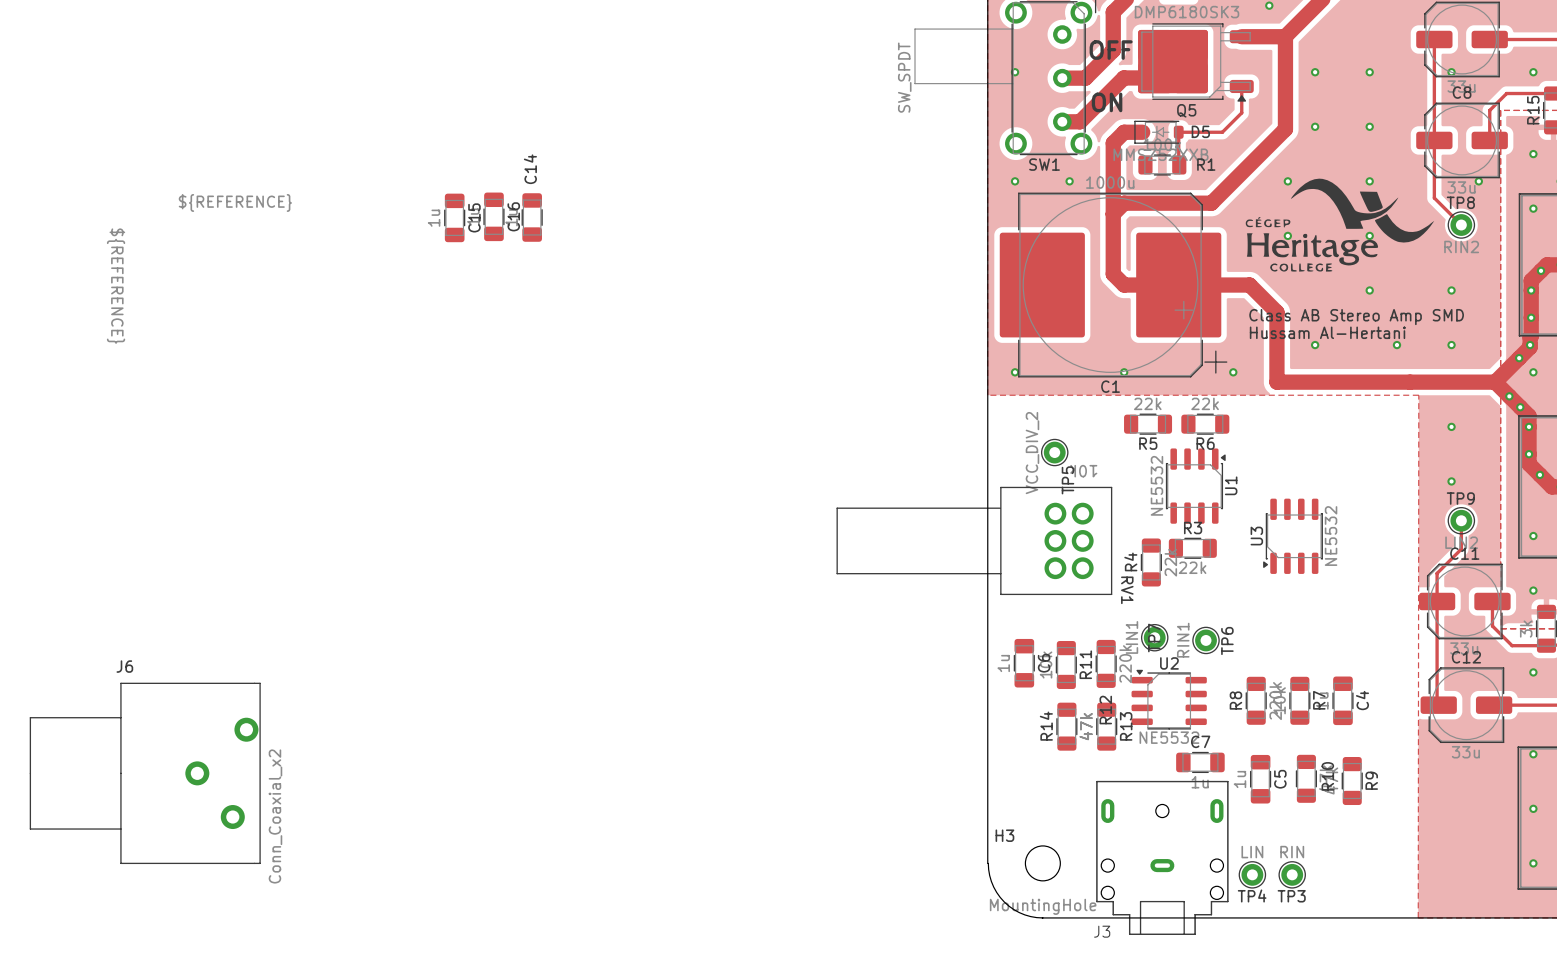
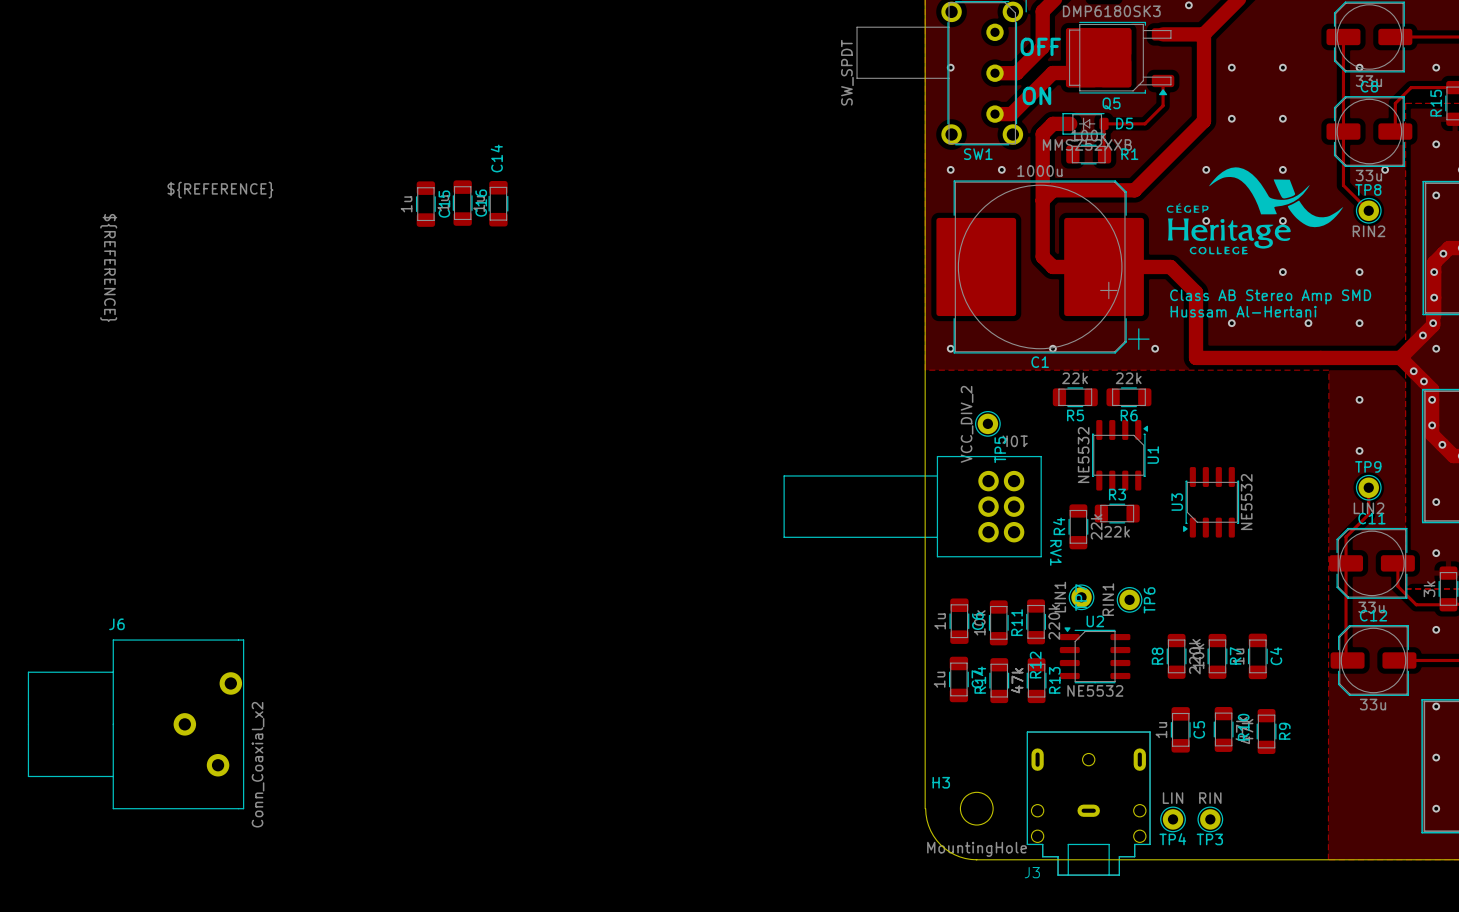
C7 rotation: 0° (1200, 762) -> 90° clockwise (958, 679)
C7 position: (1200, 762) -> (958, 679)

